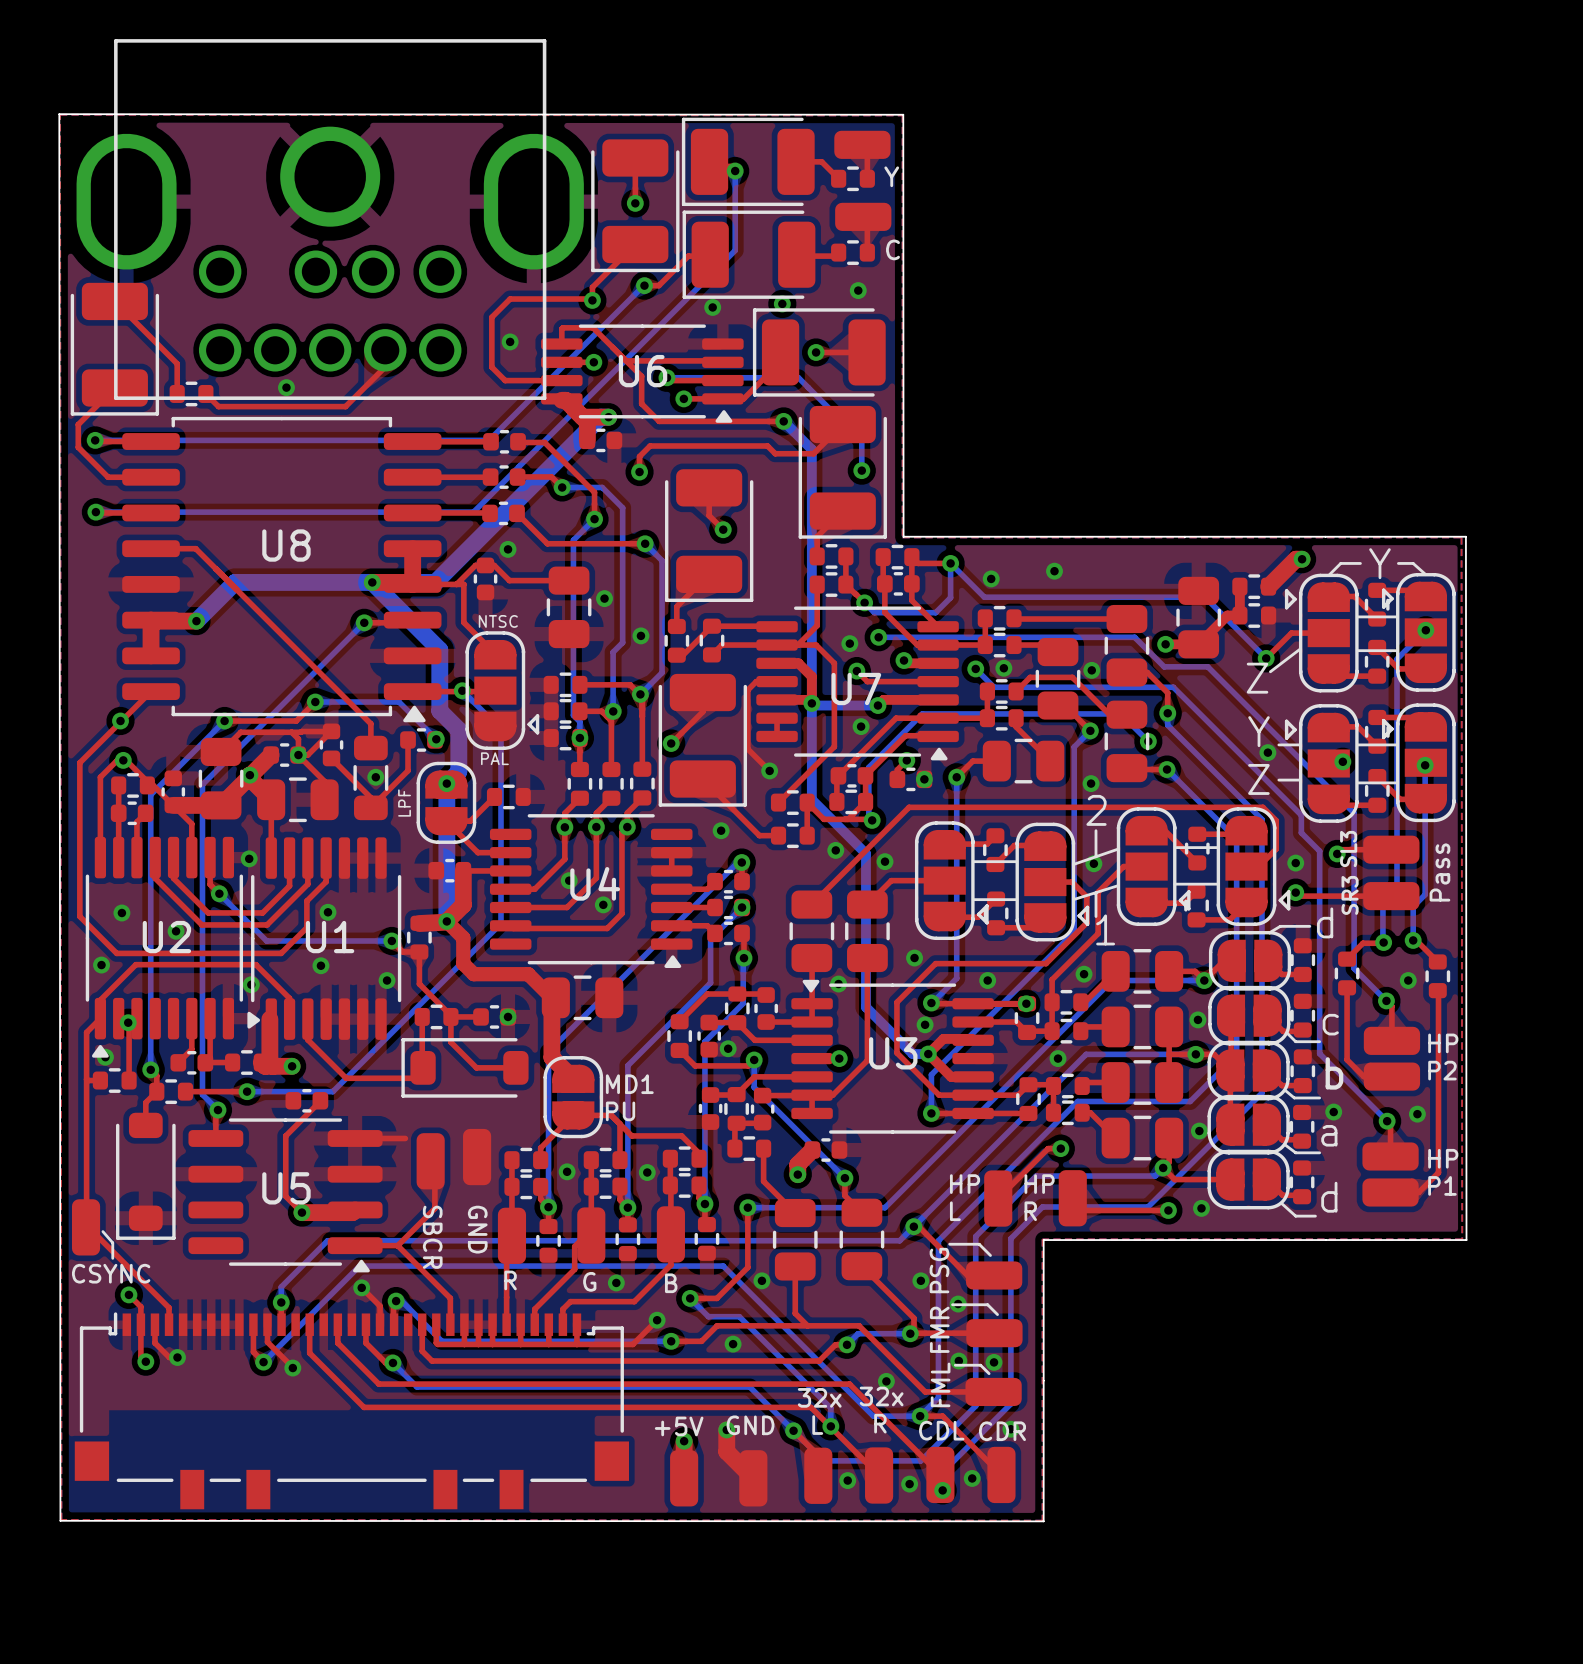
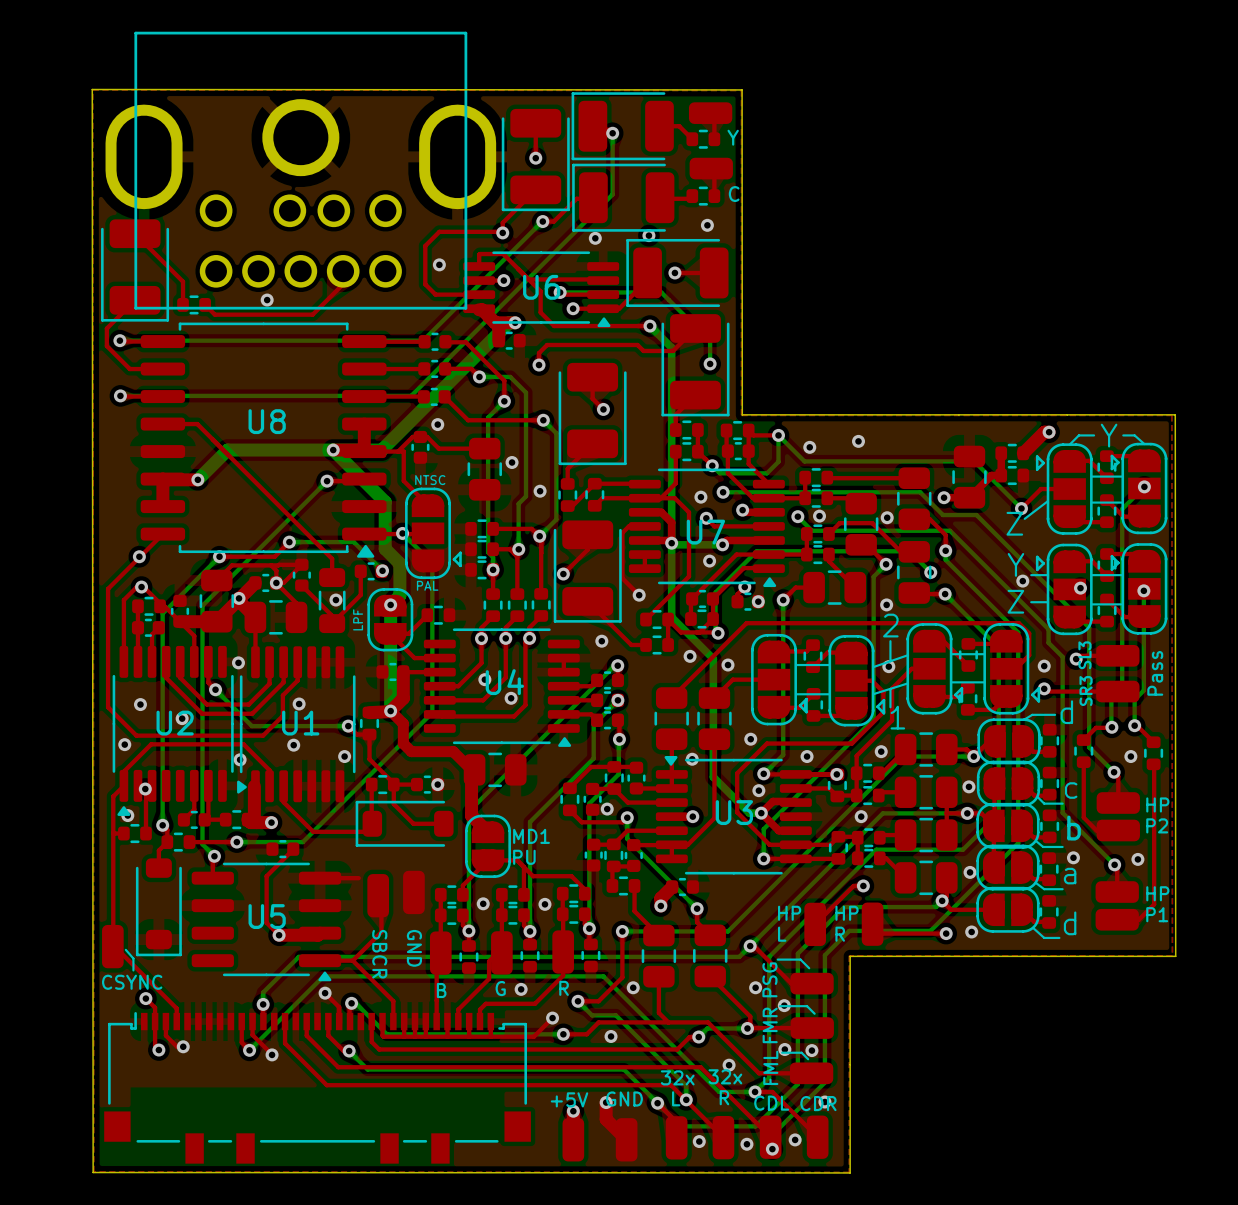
text: R (510, 1280) -> B (441, 990)
text: B (671, 1283) -> R (564, 988)

